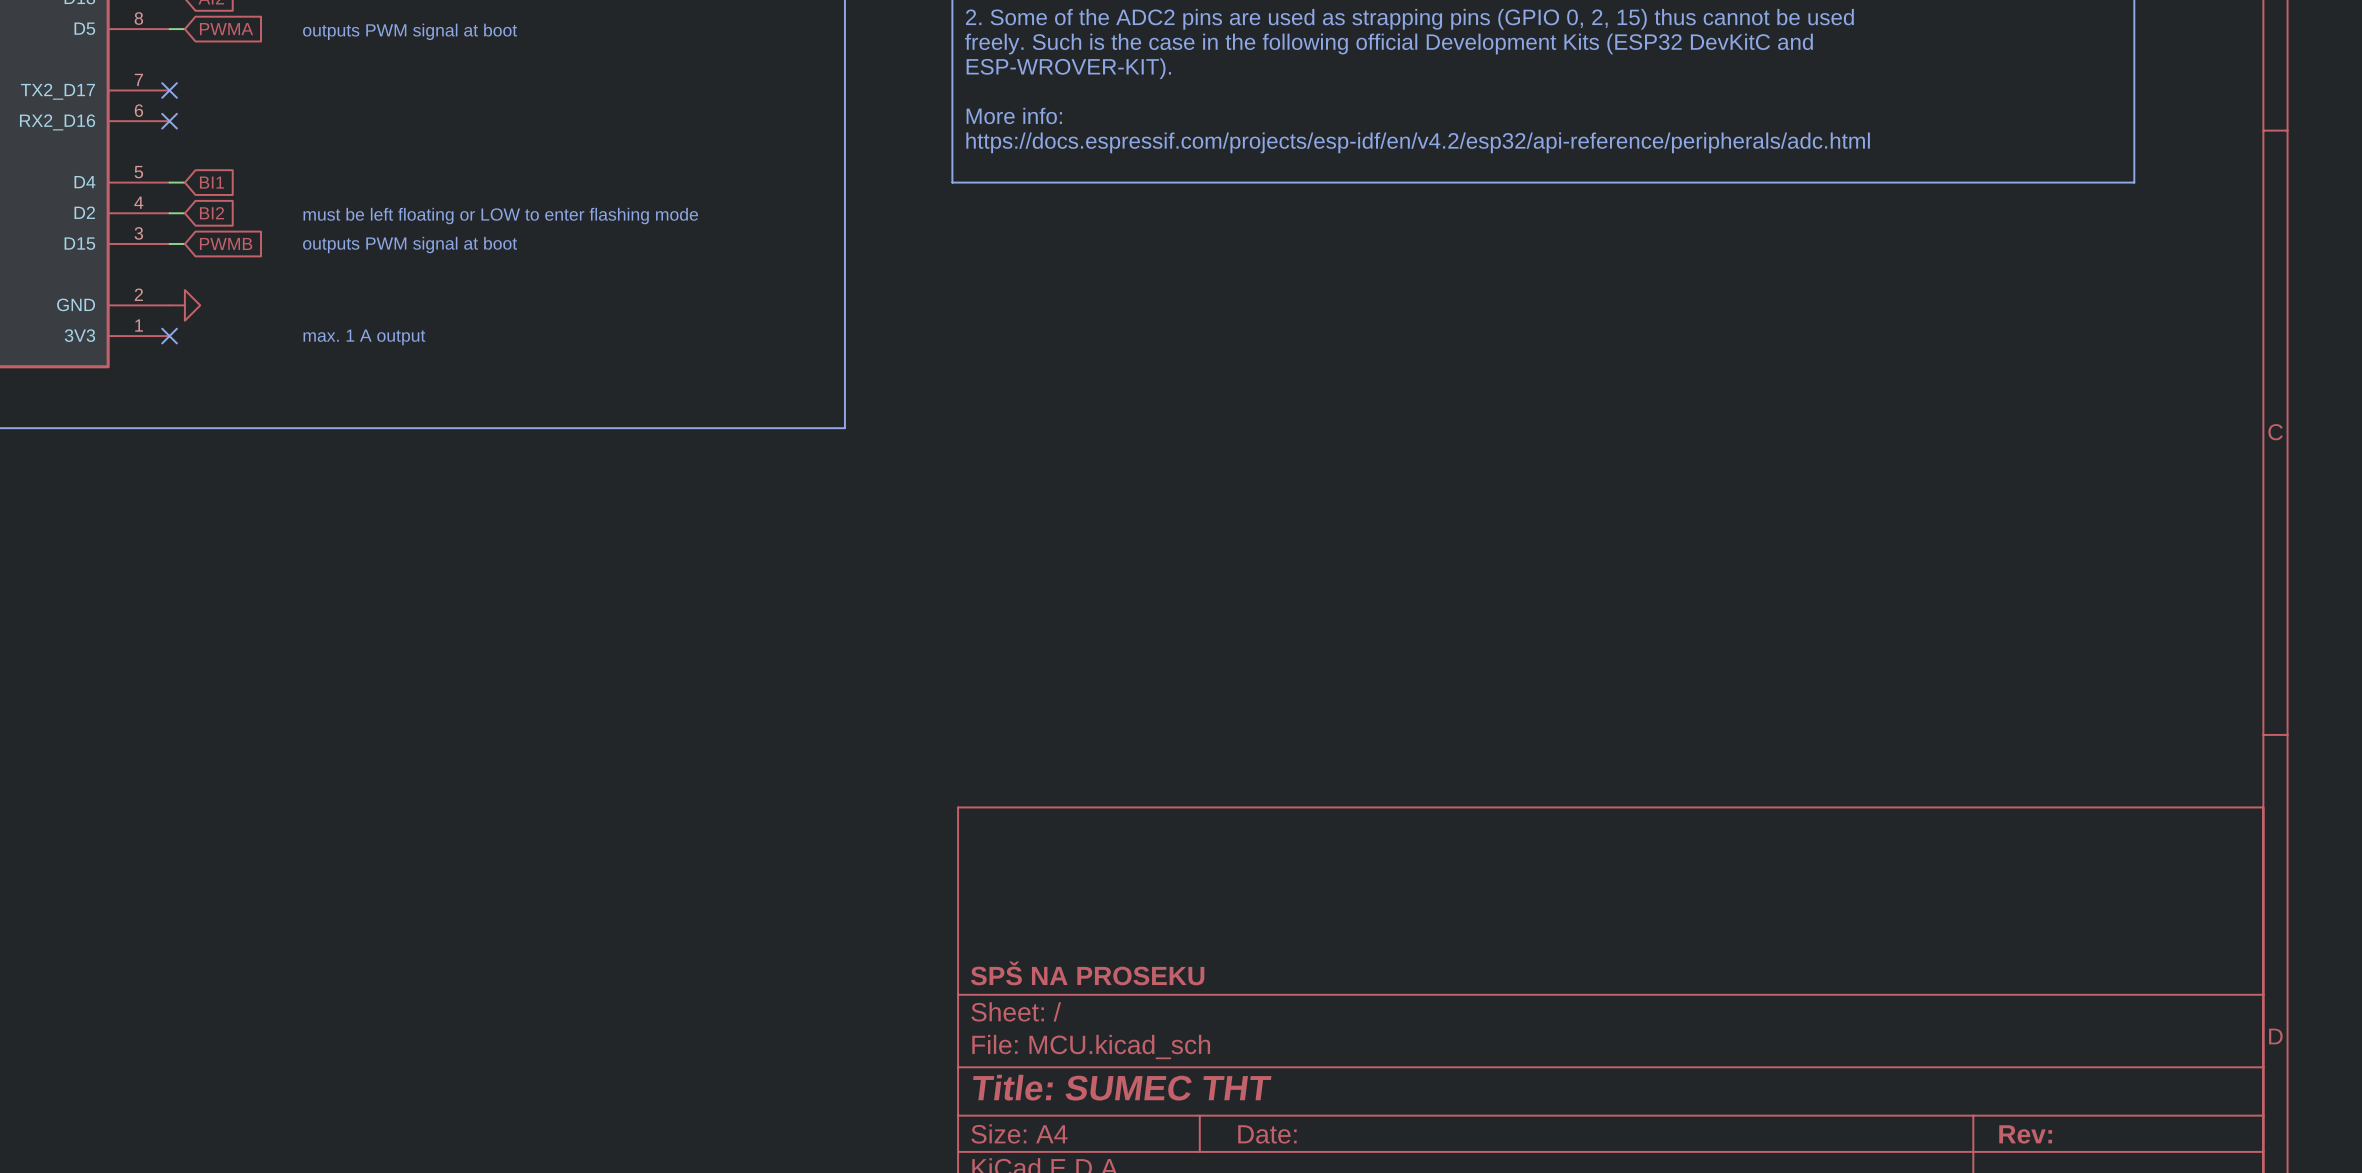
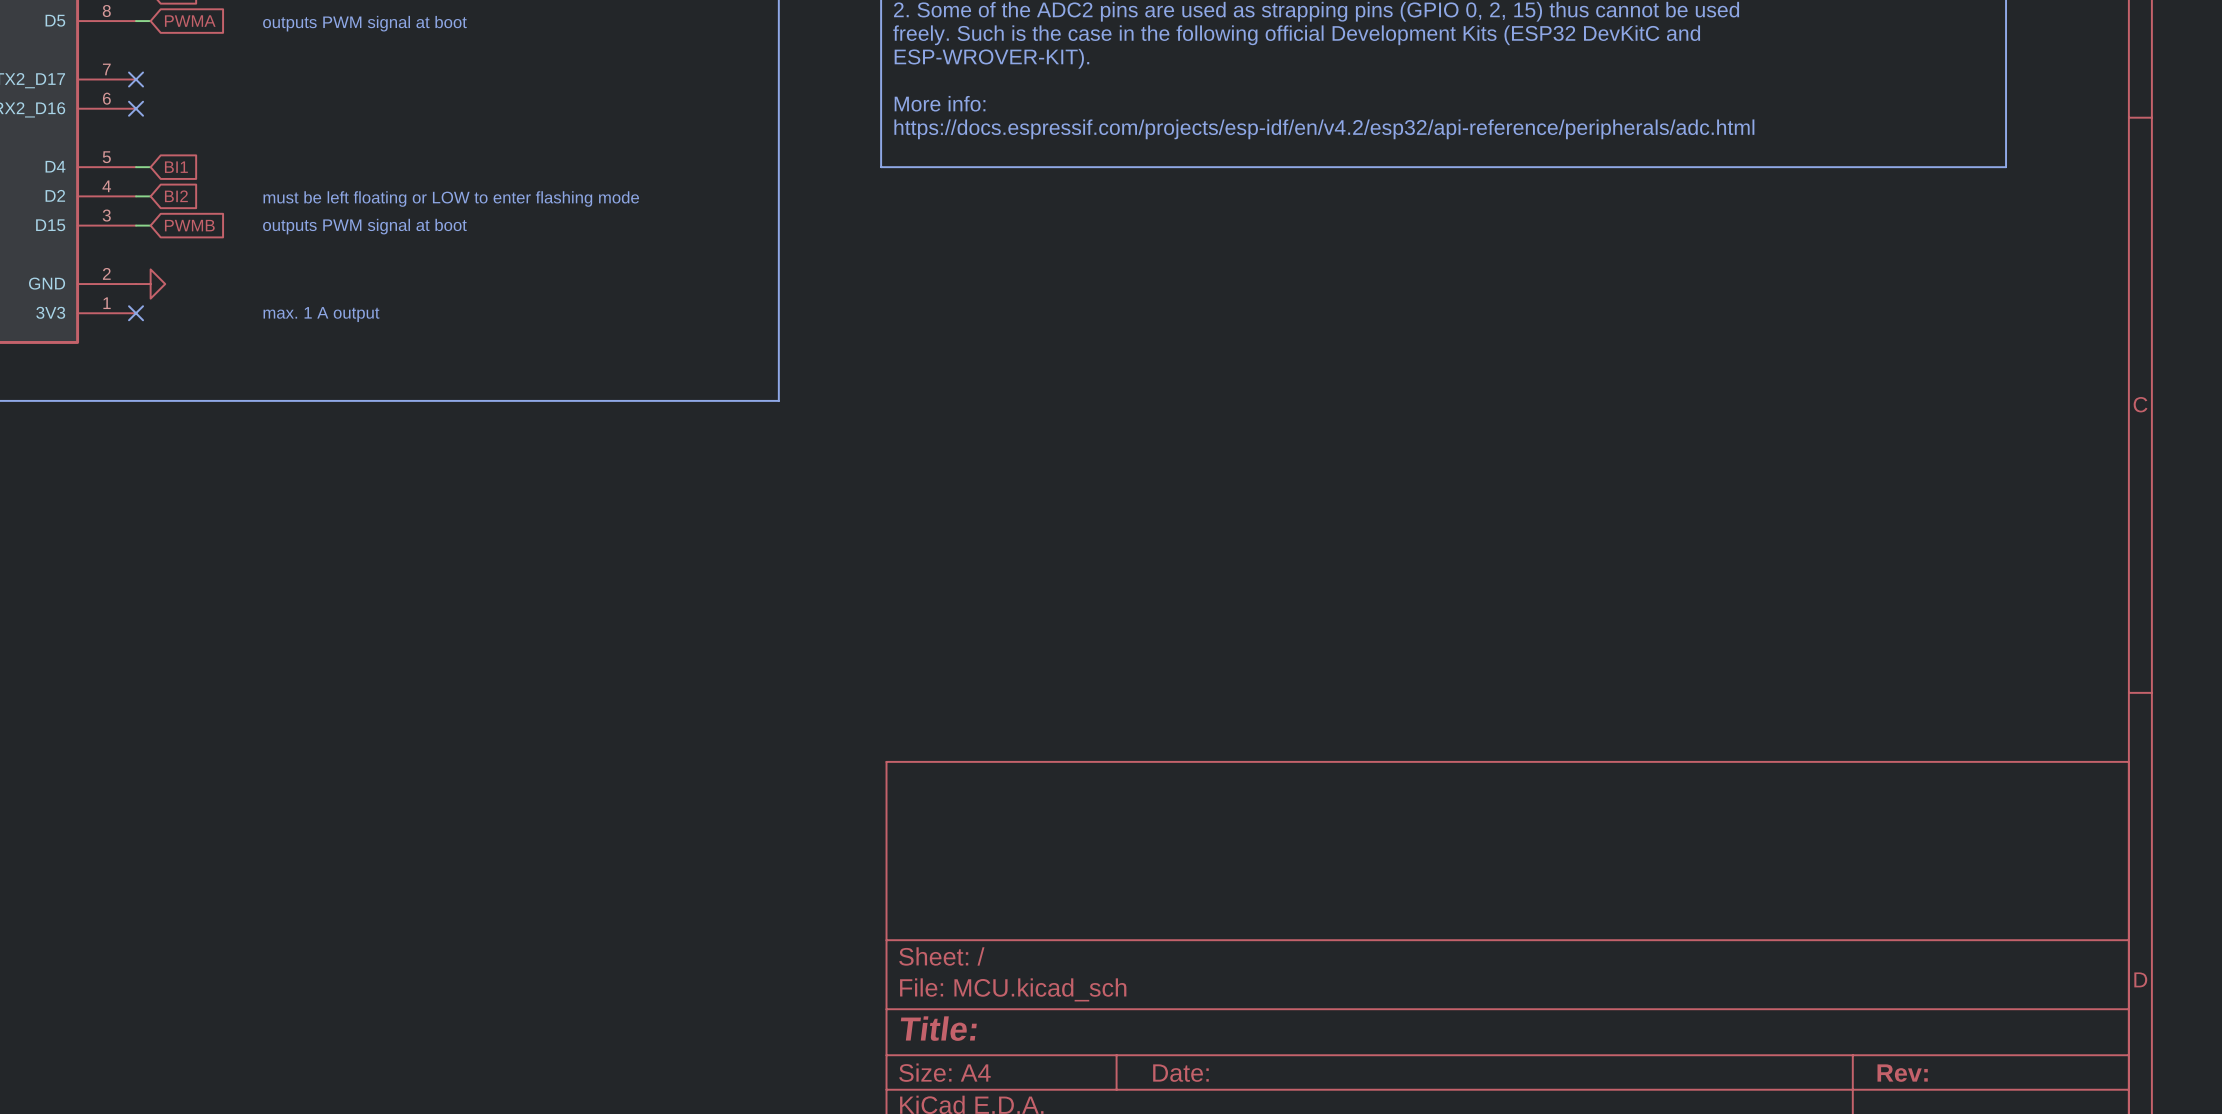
title block: SPŠ NA PROSEKU (1087, 973) -> none
title block: Title: SUMEC THT (1122, 1087) -> Title: (938, 1028)

